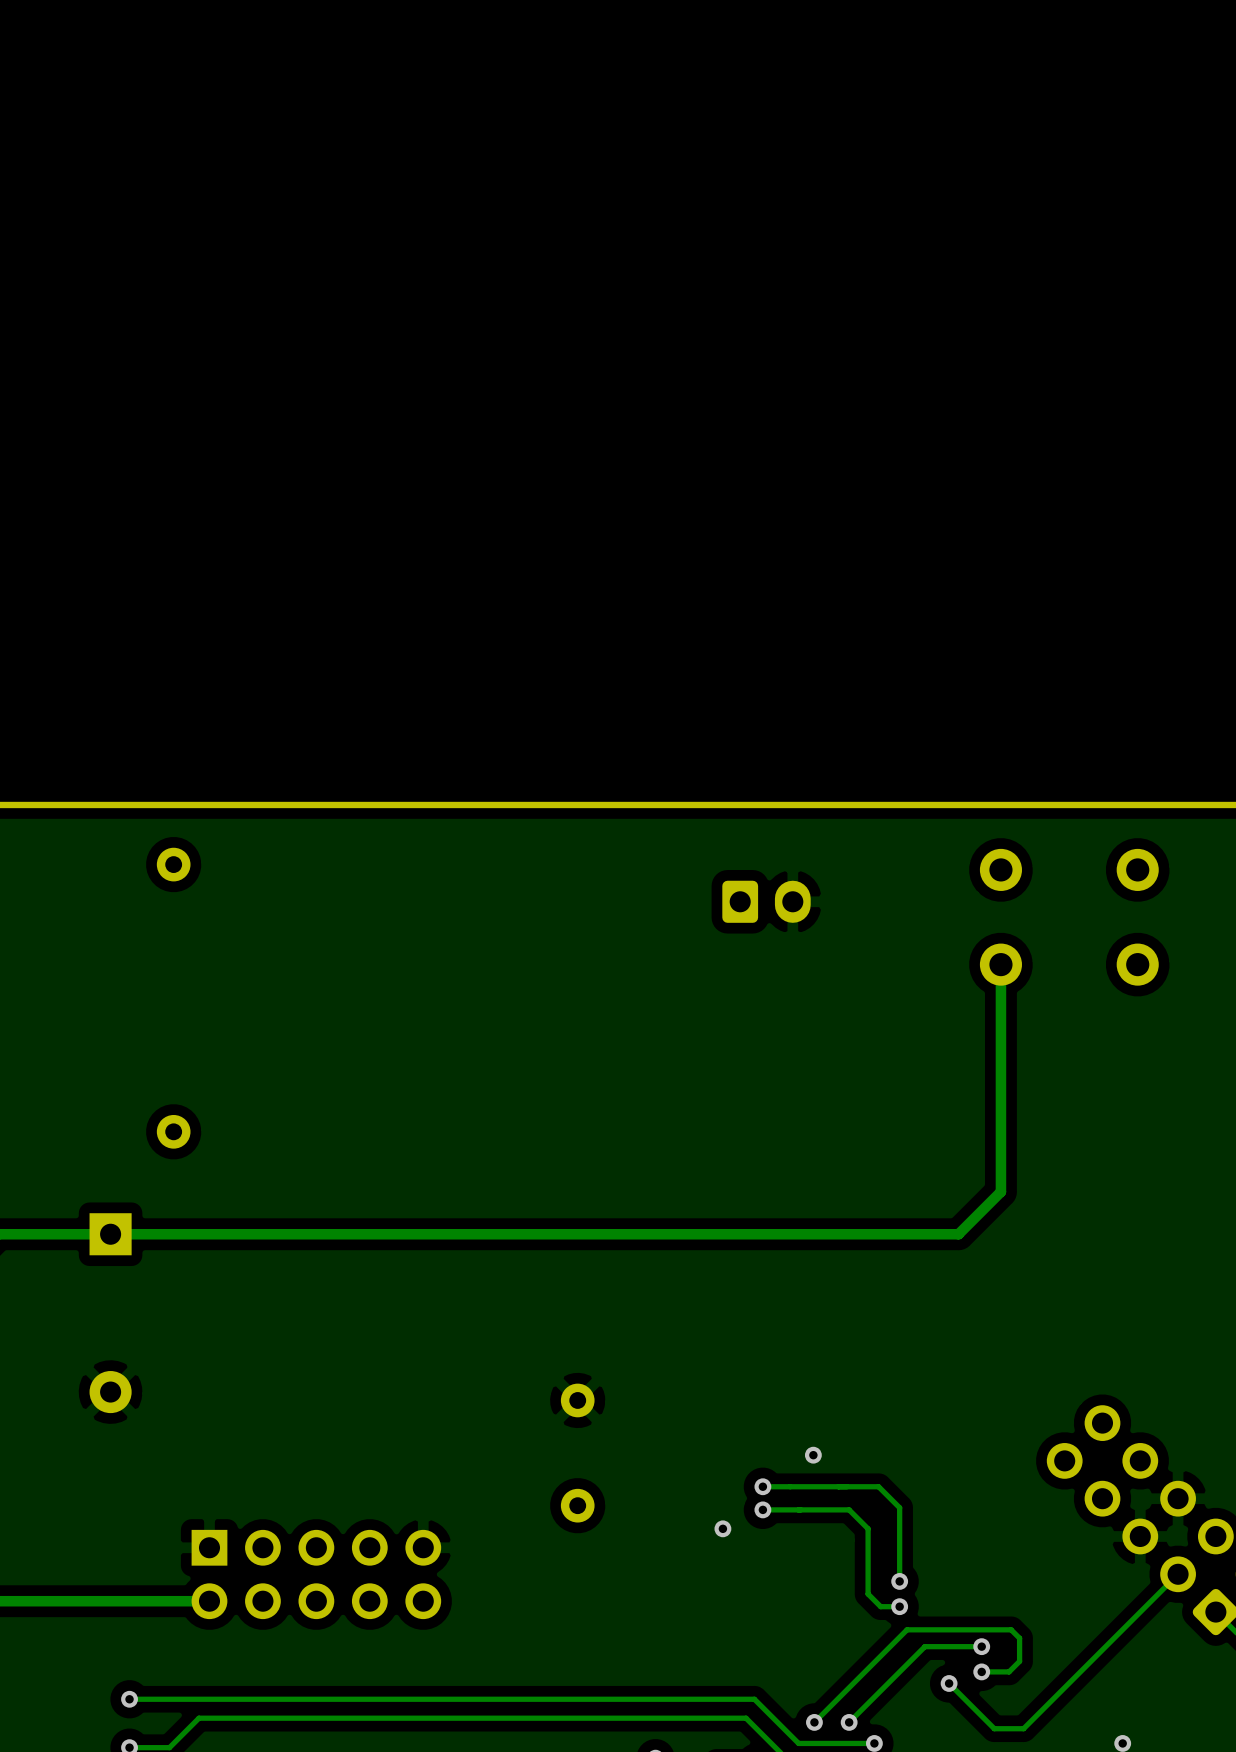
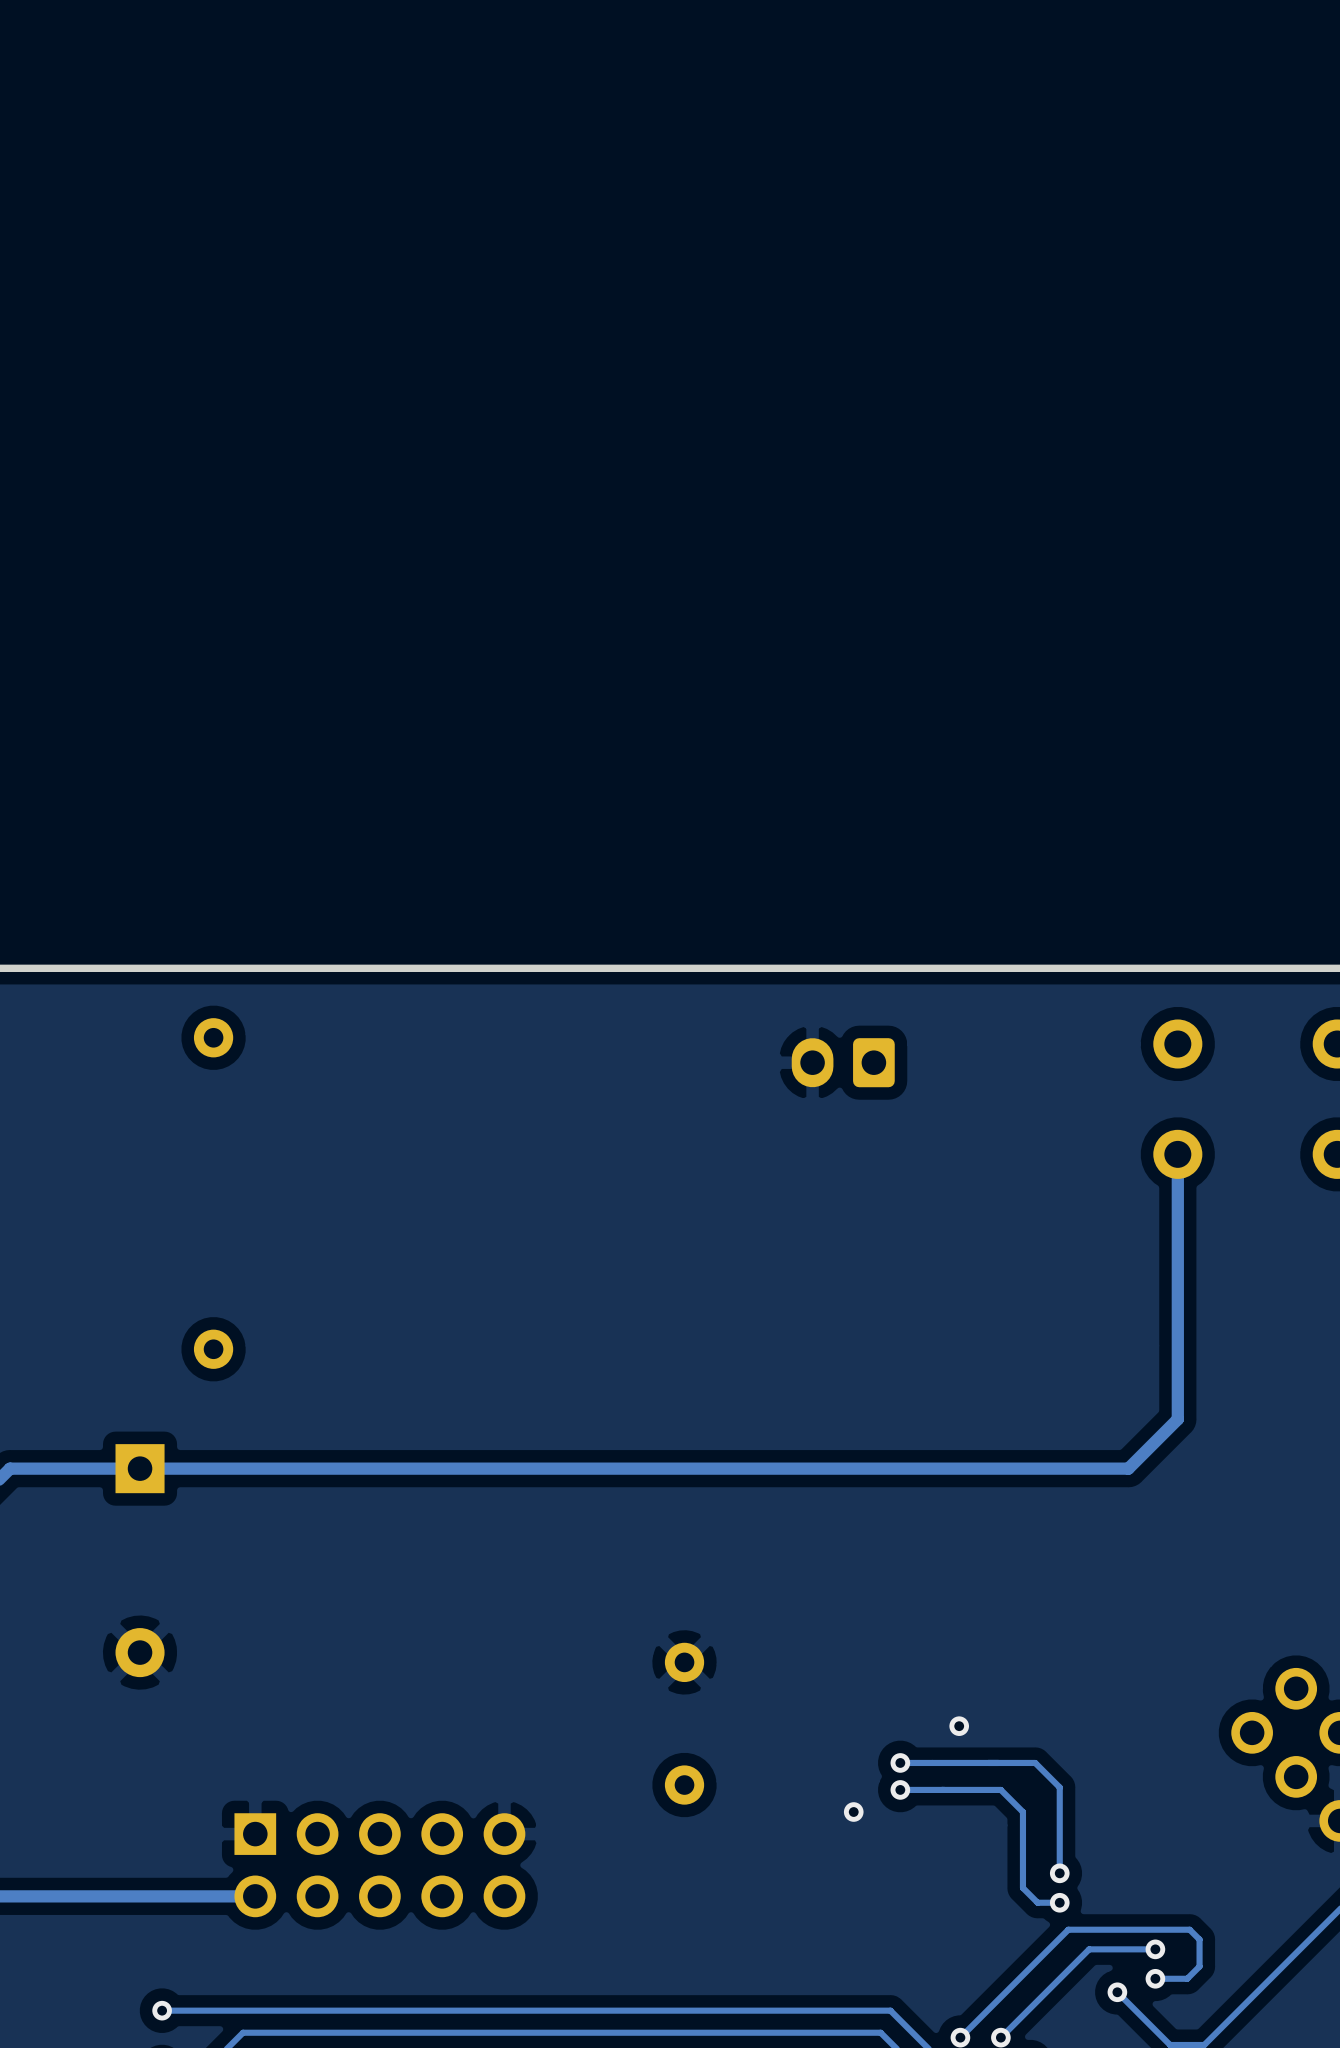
part rotation: 0° (766, 901) -> 180° (843, 1062)
part position: (766, 901) -> (843, 1062)

